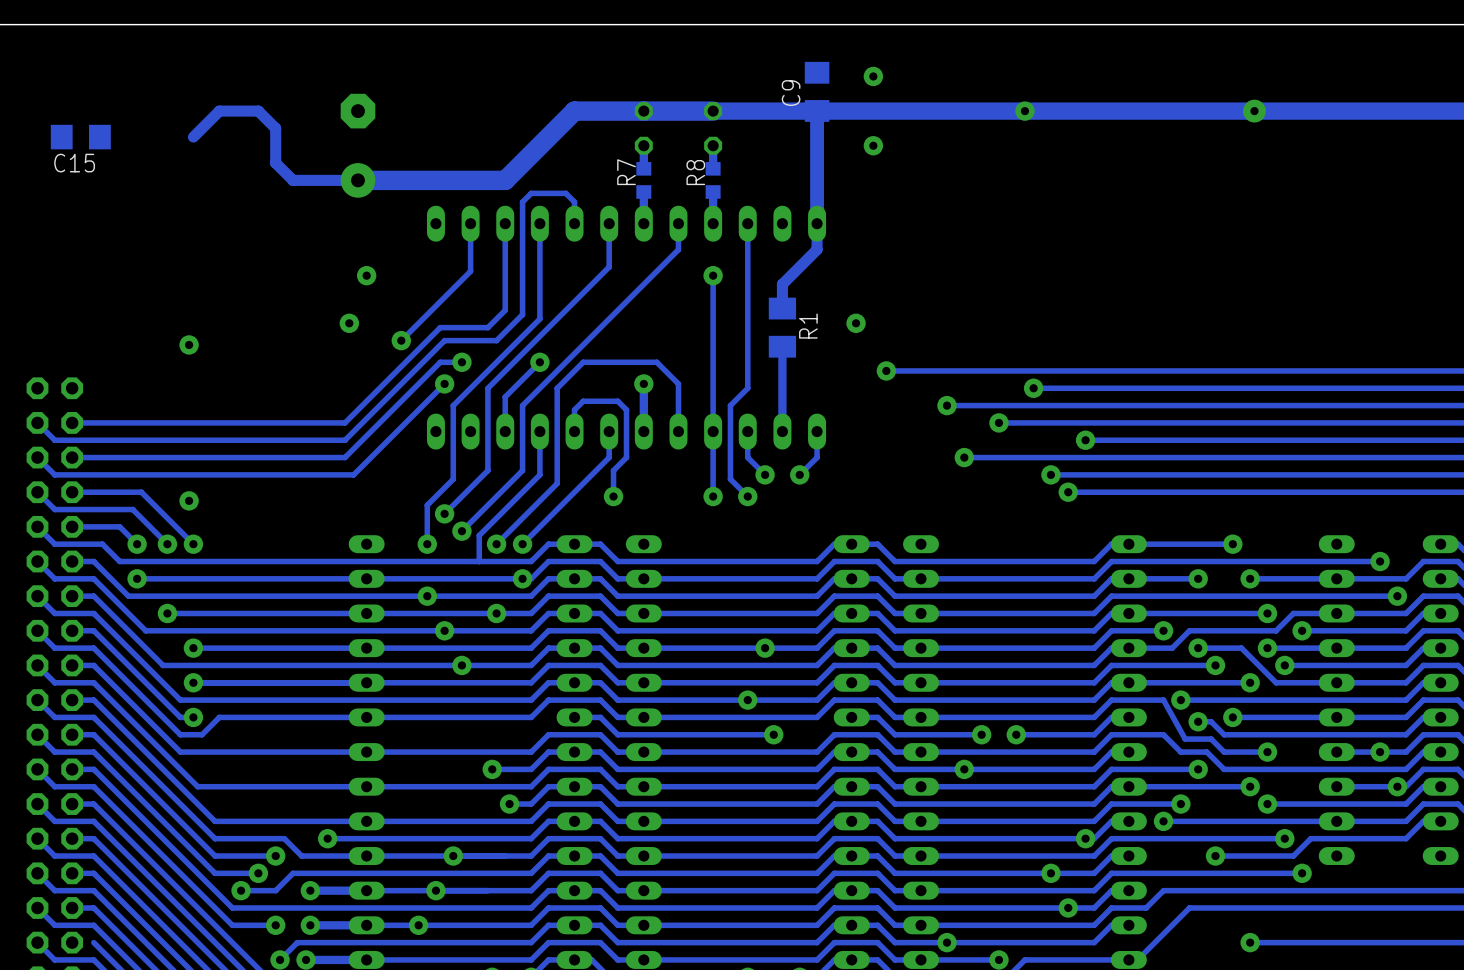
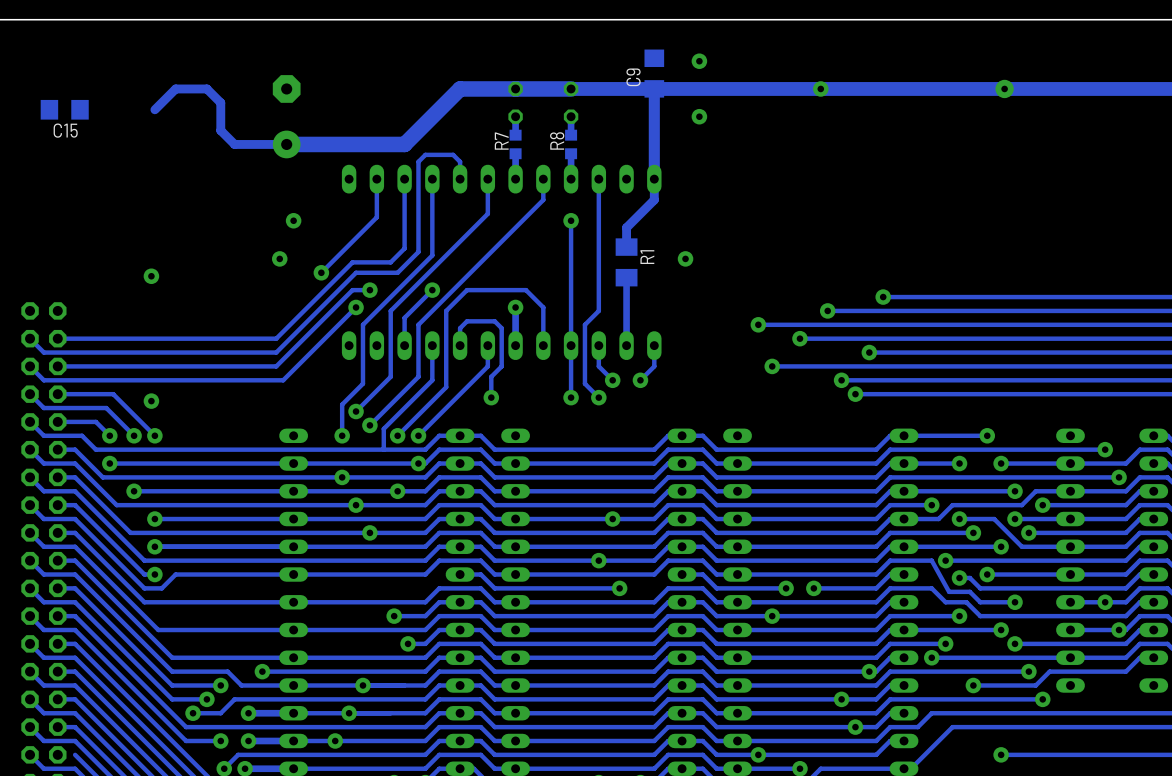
via: (886, 370) -> none
track: (1102, 370) (886, 370) -> none
via: none -> (883, 297)

